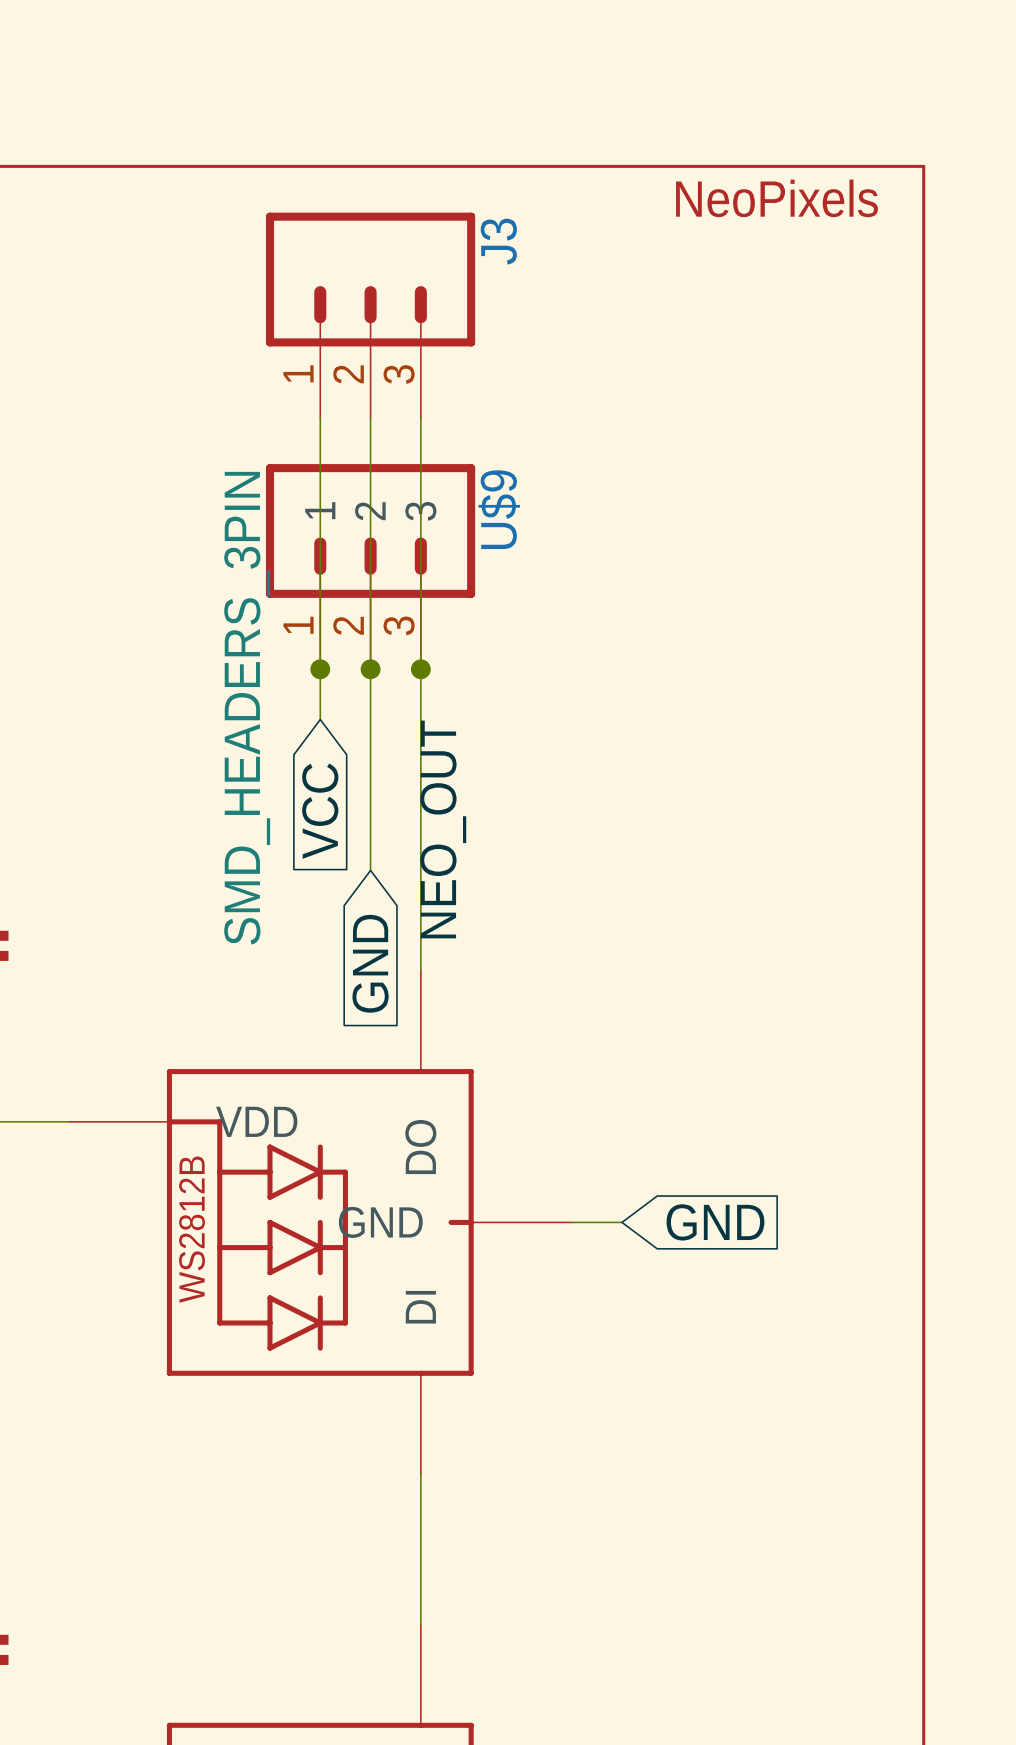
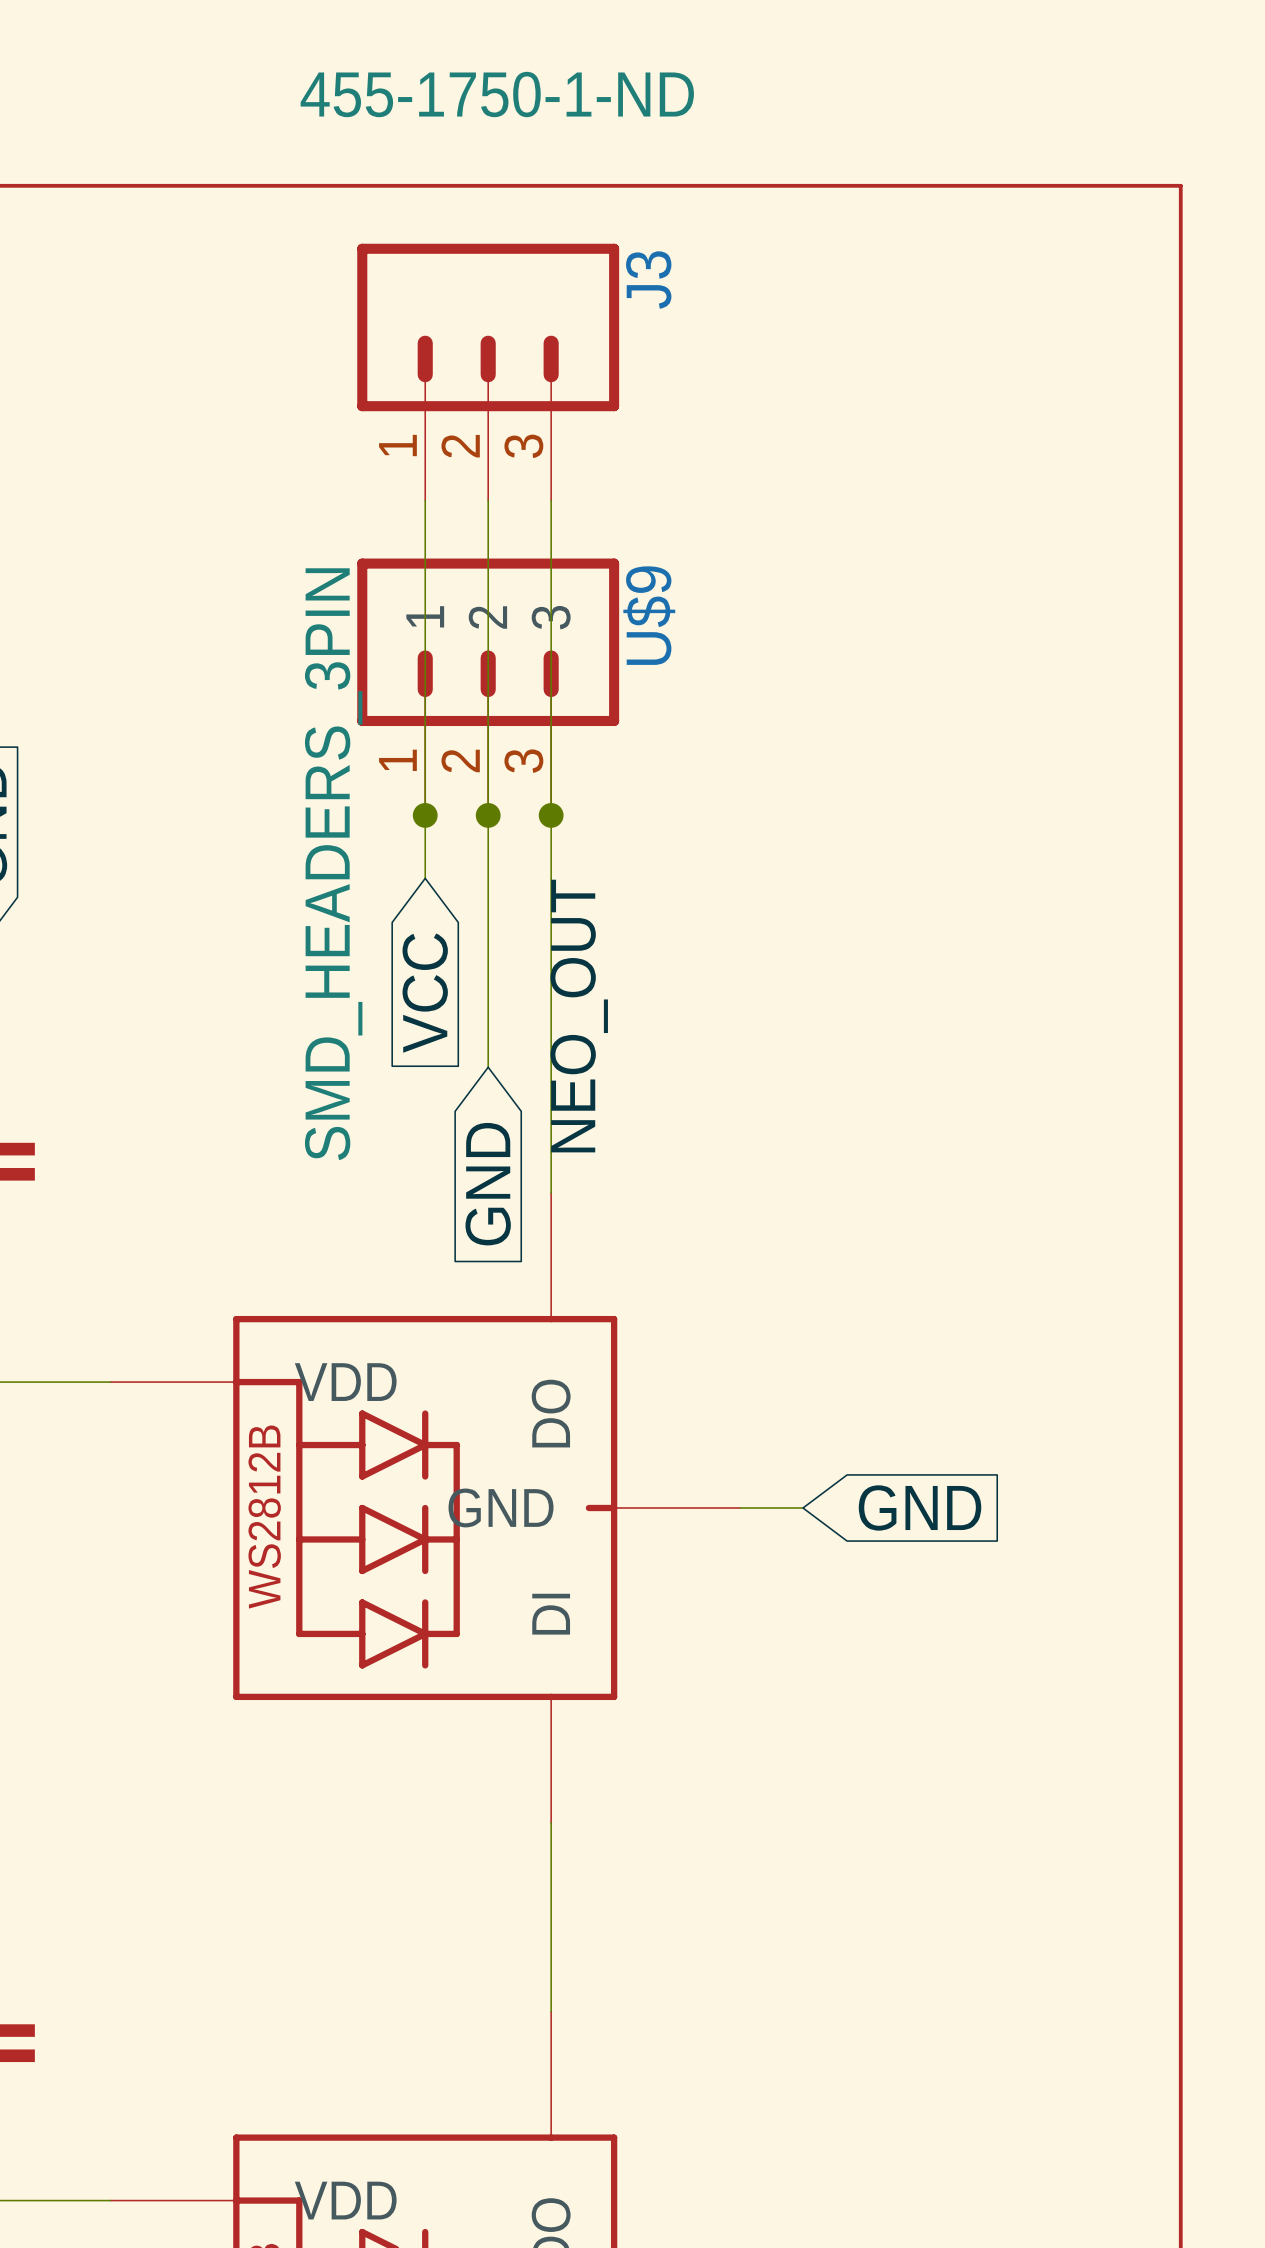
J3 value: none -> 455-1750-1-ND (497, 94)
text: NeoPixels (777, 198) -> none

